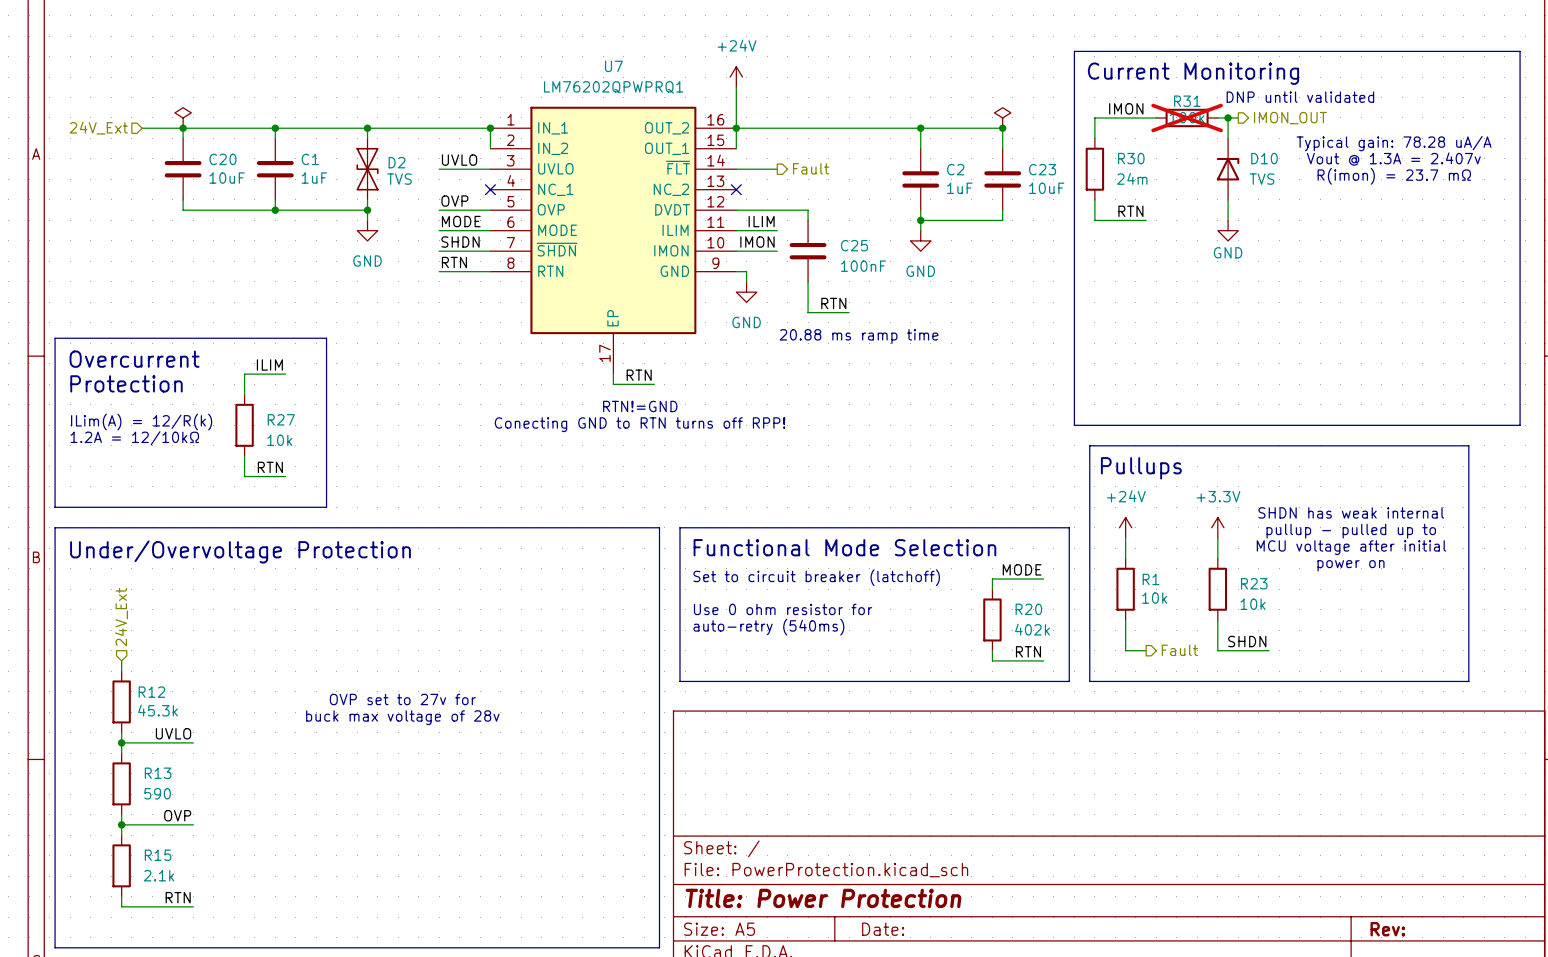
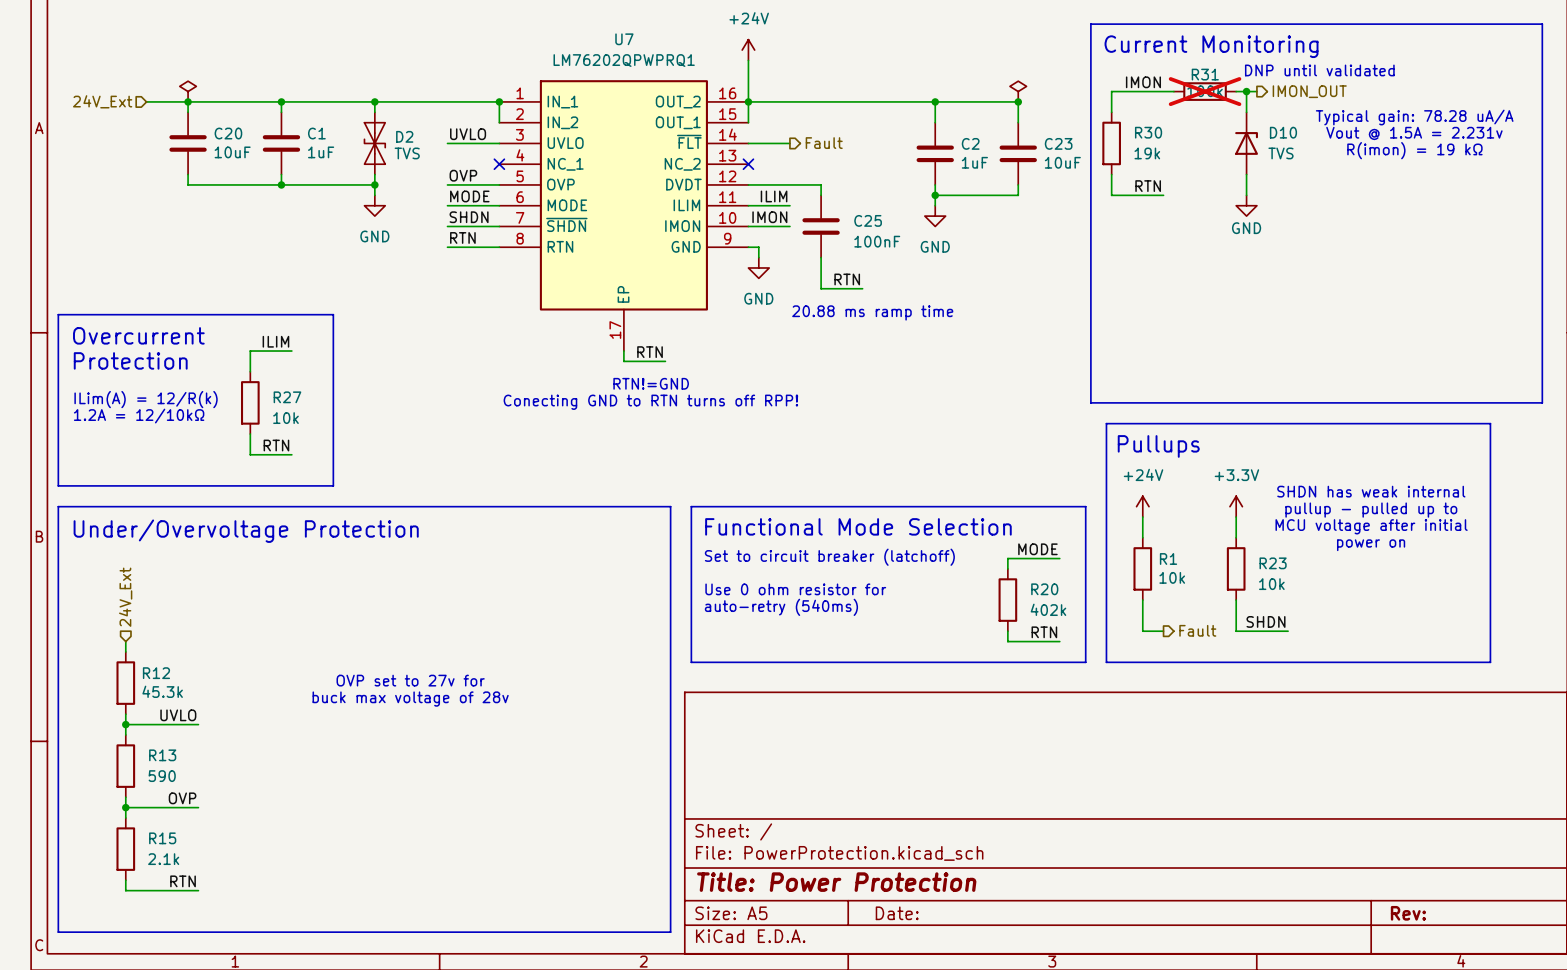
text: Vout @ 1.3A = 2.407v (1393, 159) -> Vout @ 1.5A = 2.231v (1414, 133)
text: R(imon) = 23.7 mΩ (1394, 176) -> R(imon) = 19 kΩ (1414, 150)
R30 value: 24m (1132, 178) -> 19k (1147, 153)

